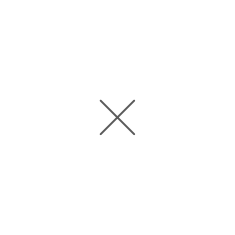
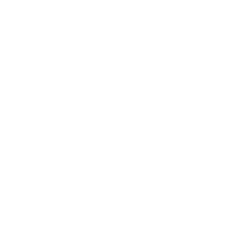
no-connect mark: (117, 117) -> none

